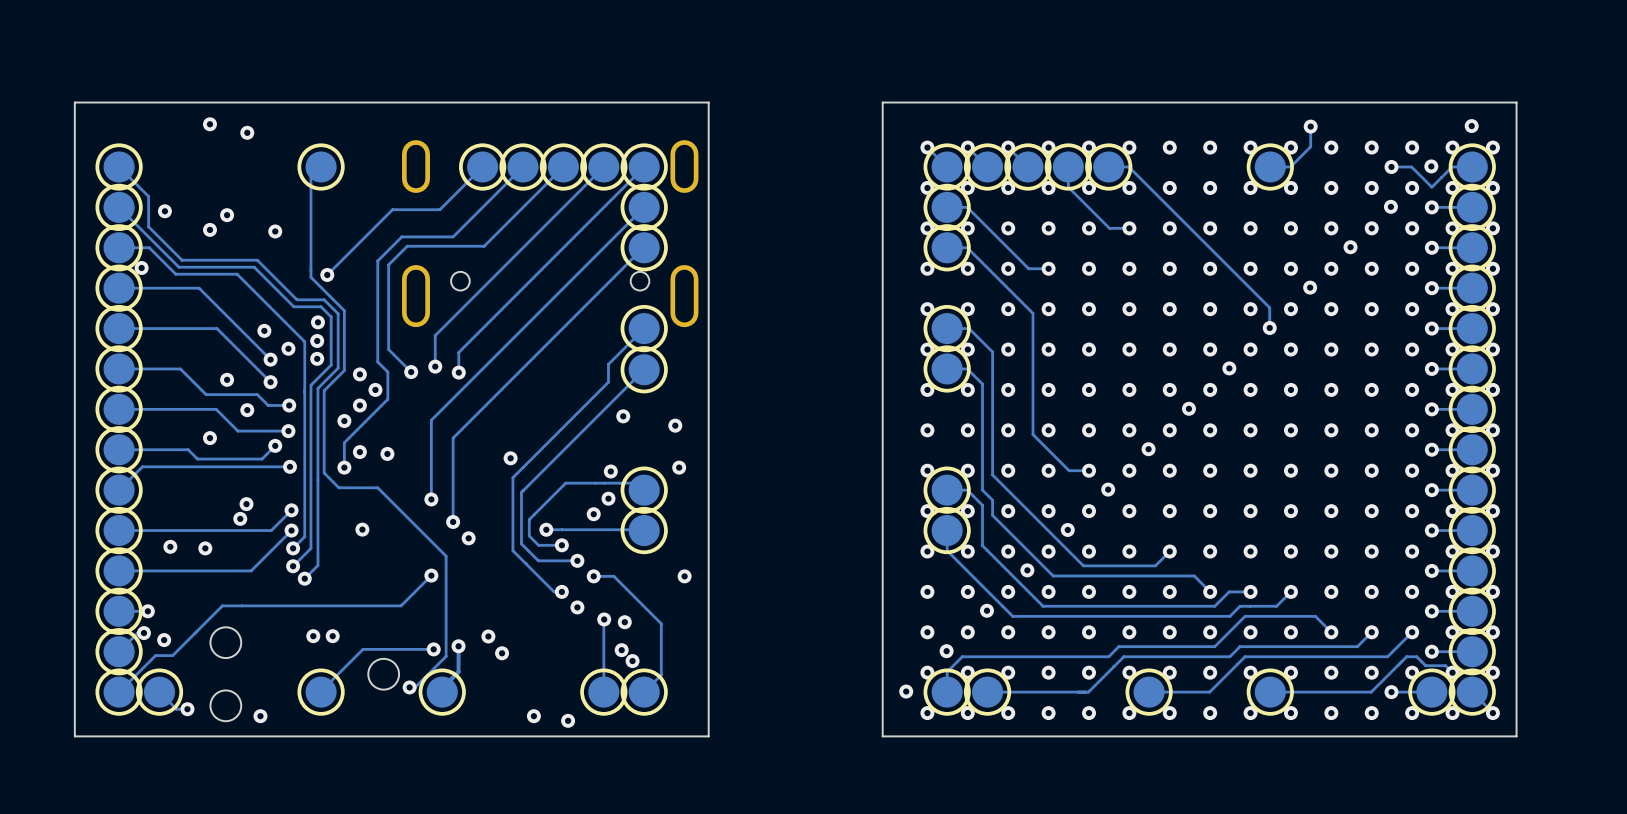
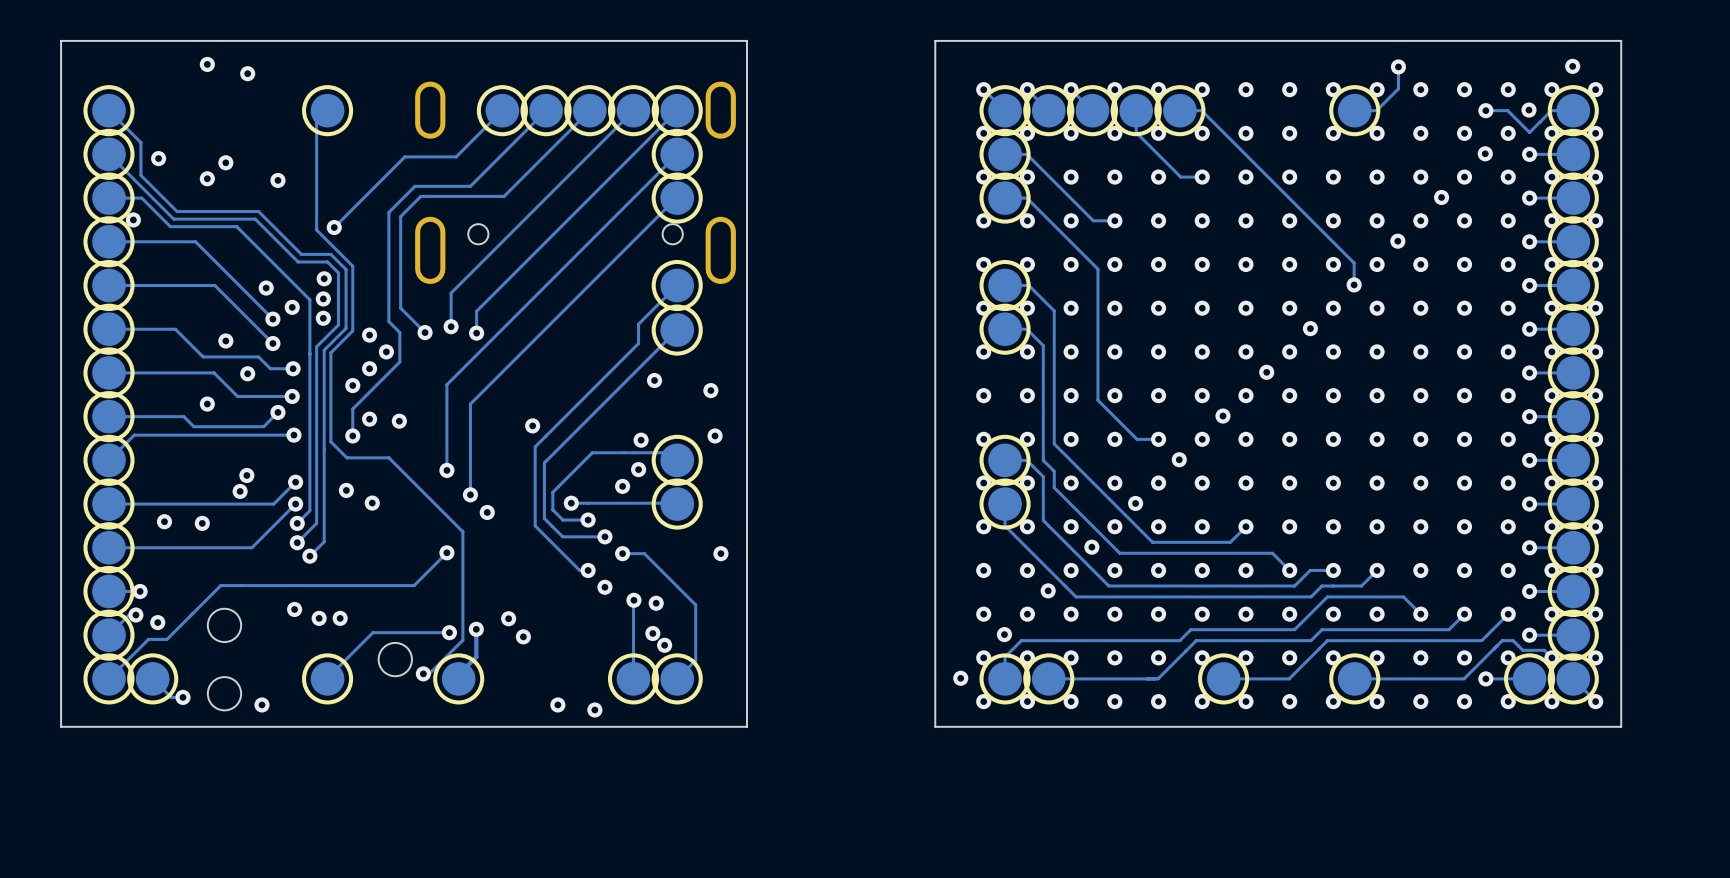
via: none -> (346, 490)
via: none -> (294, 609)

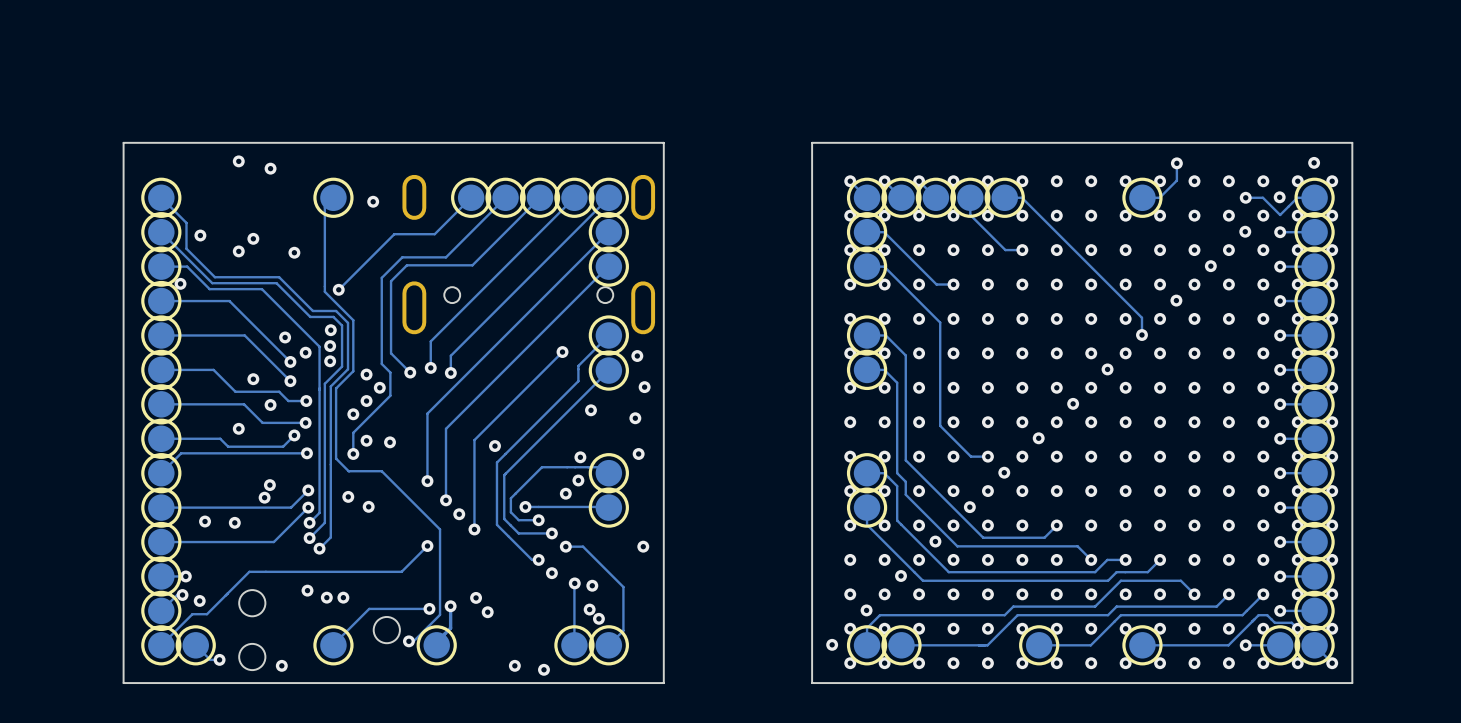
via: none -> (373, 201)
track: none -> (562, 352) (474, 440) (474, 529)
via: none -> (562, 352)
via: none -> (637, 356)
via: none -> (644, 387)
via: none -> (474, 529)

